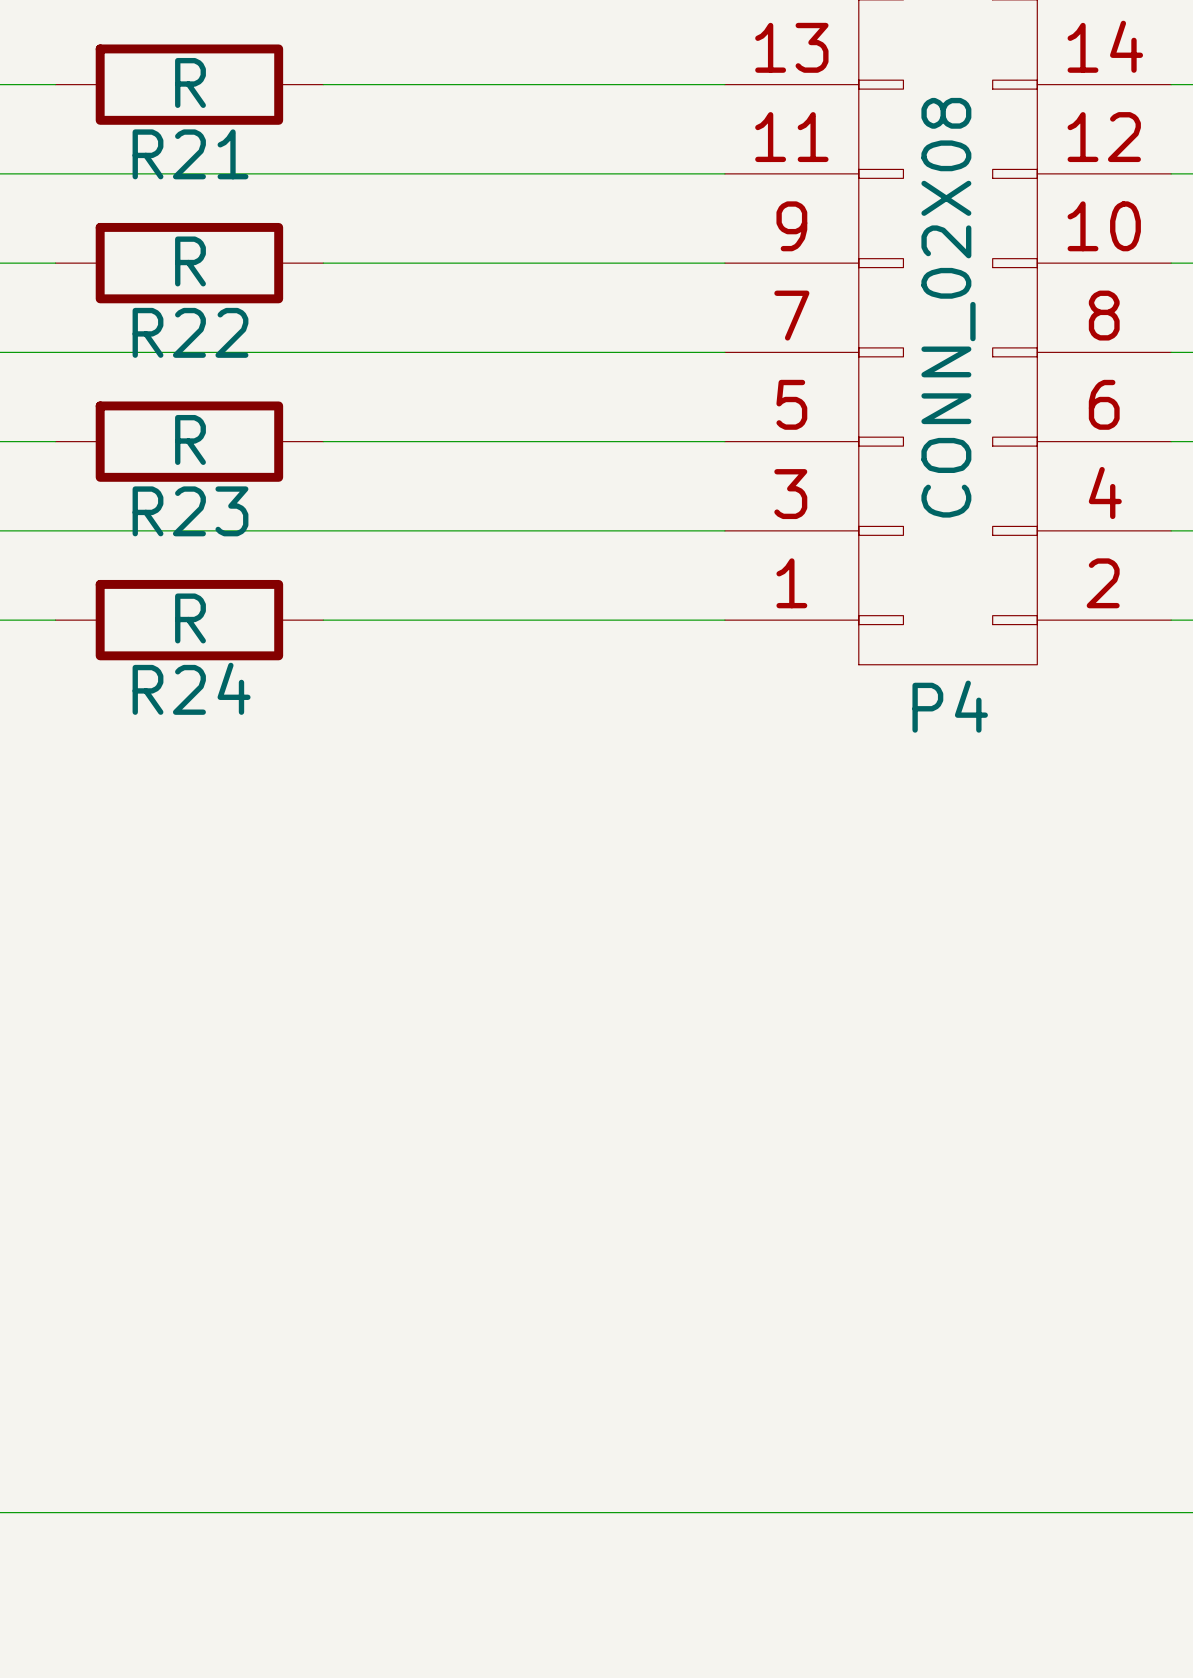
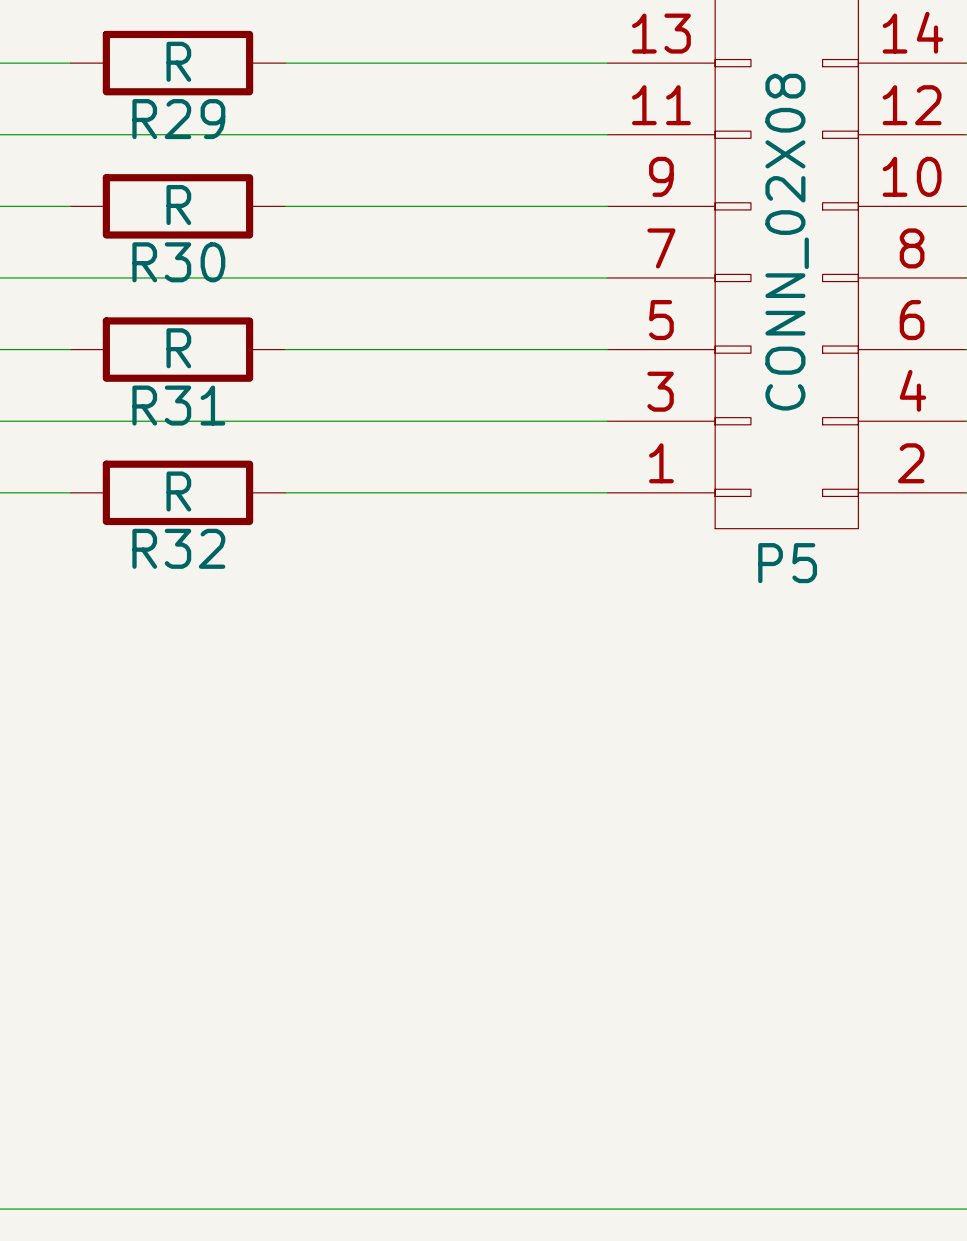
R21 name: R21 (190, 154) -> R29 (178, 119)
R22 name: R22 (190, 332) -> R30 (178, 262)
R23 name: R23 (190, 511) -> R31 (178, 405)
R24 name: R24 (191, 688) -> R32 (178, 548)
P4 name: P4 (950, 706) -> P5 (787, 563)

